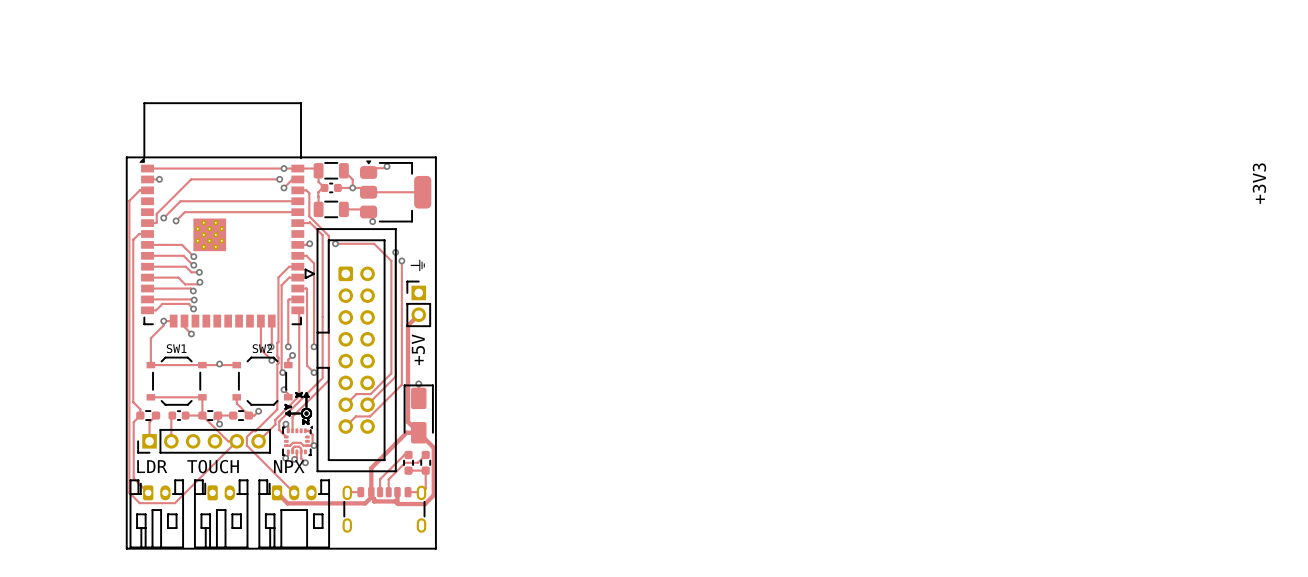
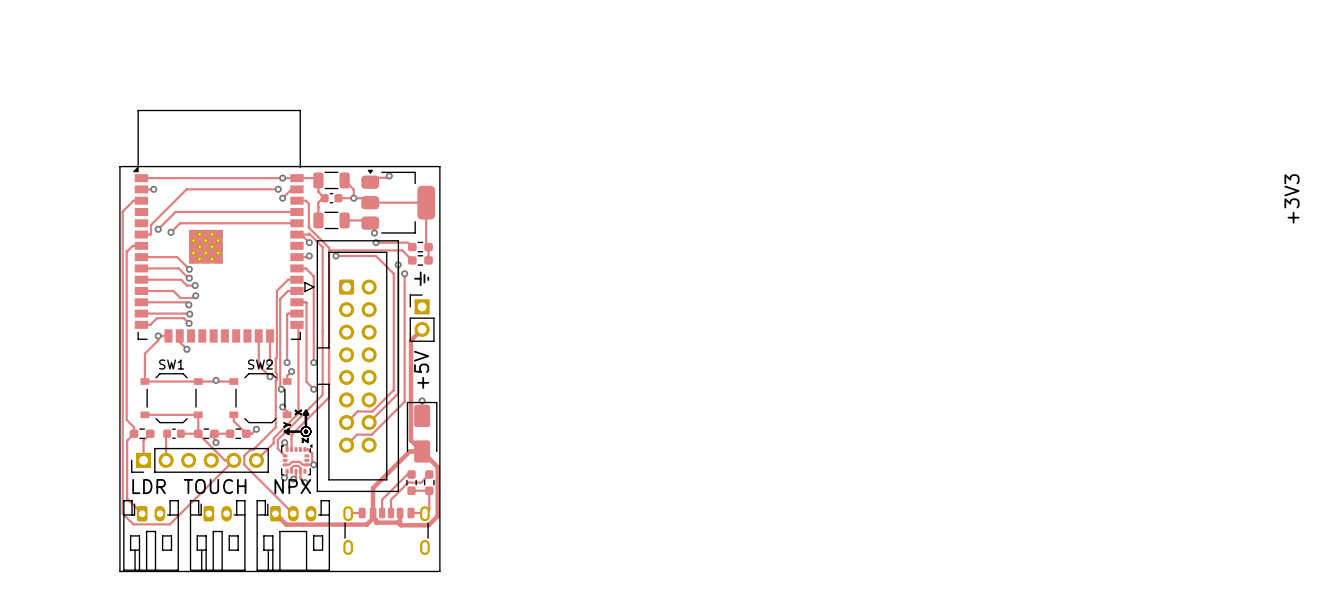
track: none -> (426, 202) (426, 244) (428, 247) (428, 260)
track: none -> (301, 234) (309, 242)
via: none -> (309, 242)
track: none -> (375, 242) (407, 242) (412, 247)
via: none -> (375, 242)
part: none -> (420, 247)
track: none -> (329, 251) (402, 250) (412, 260)
part: none -> (420, 260)

